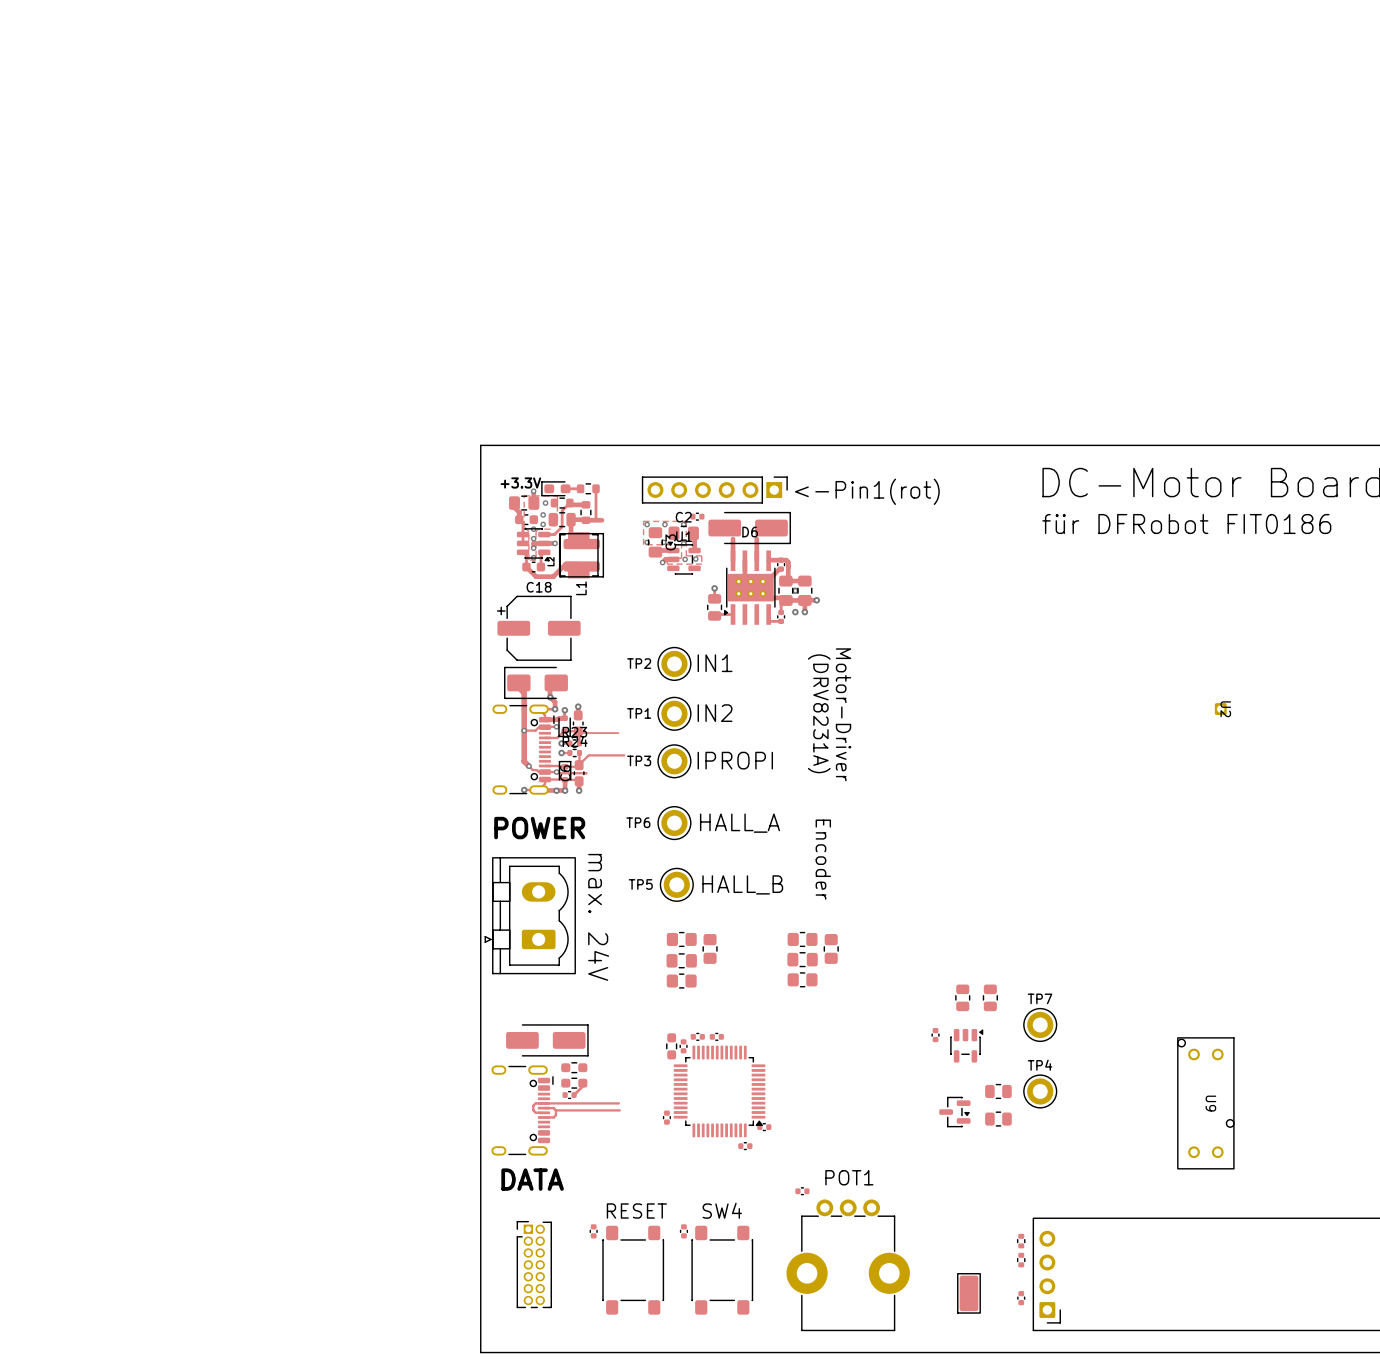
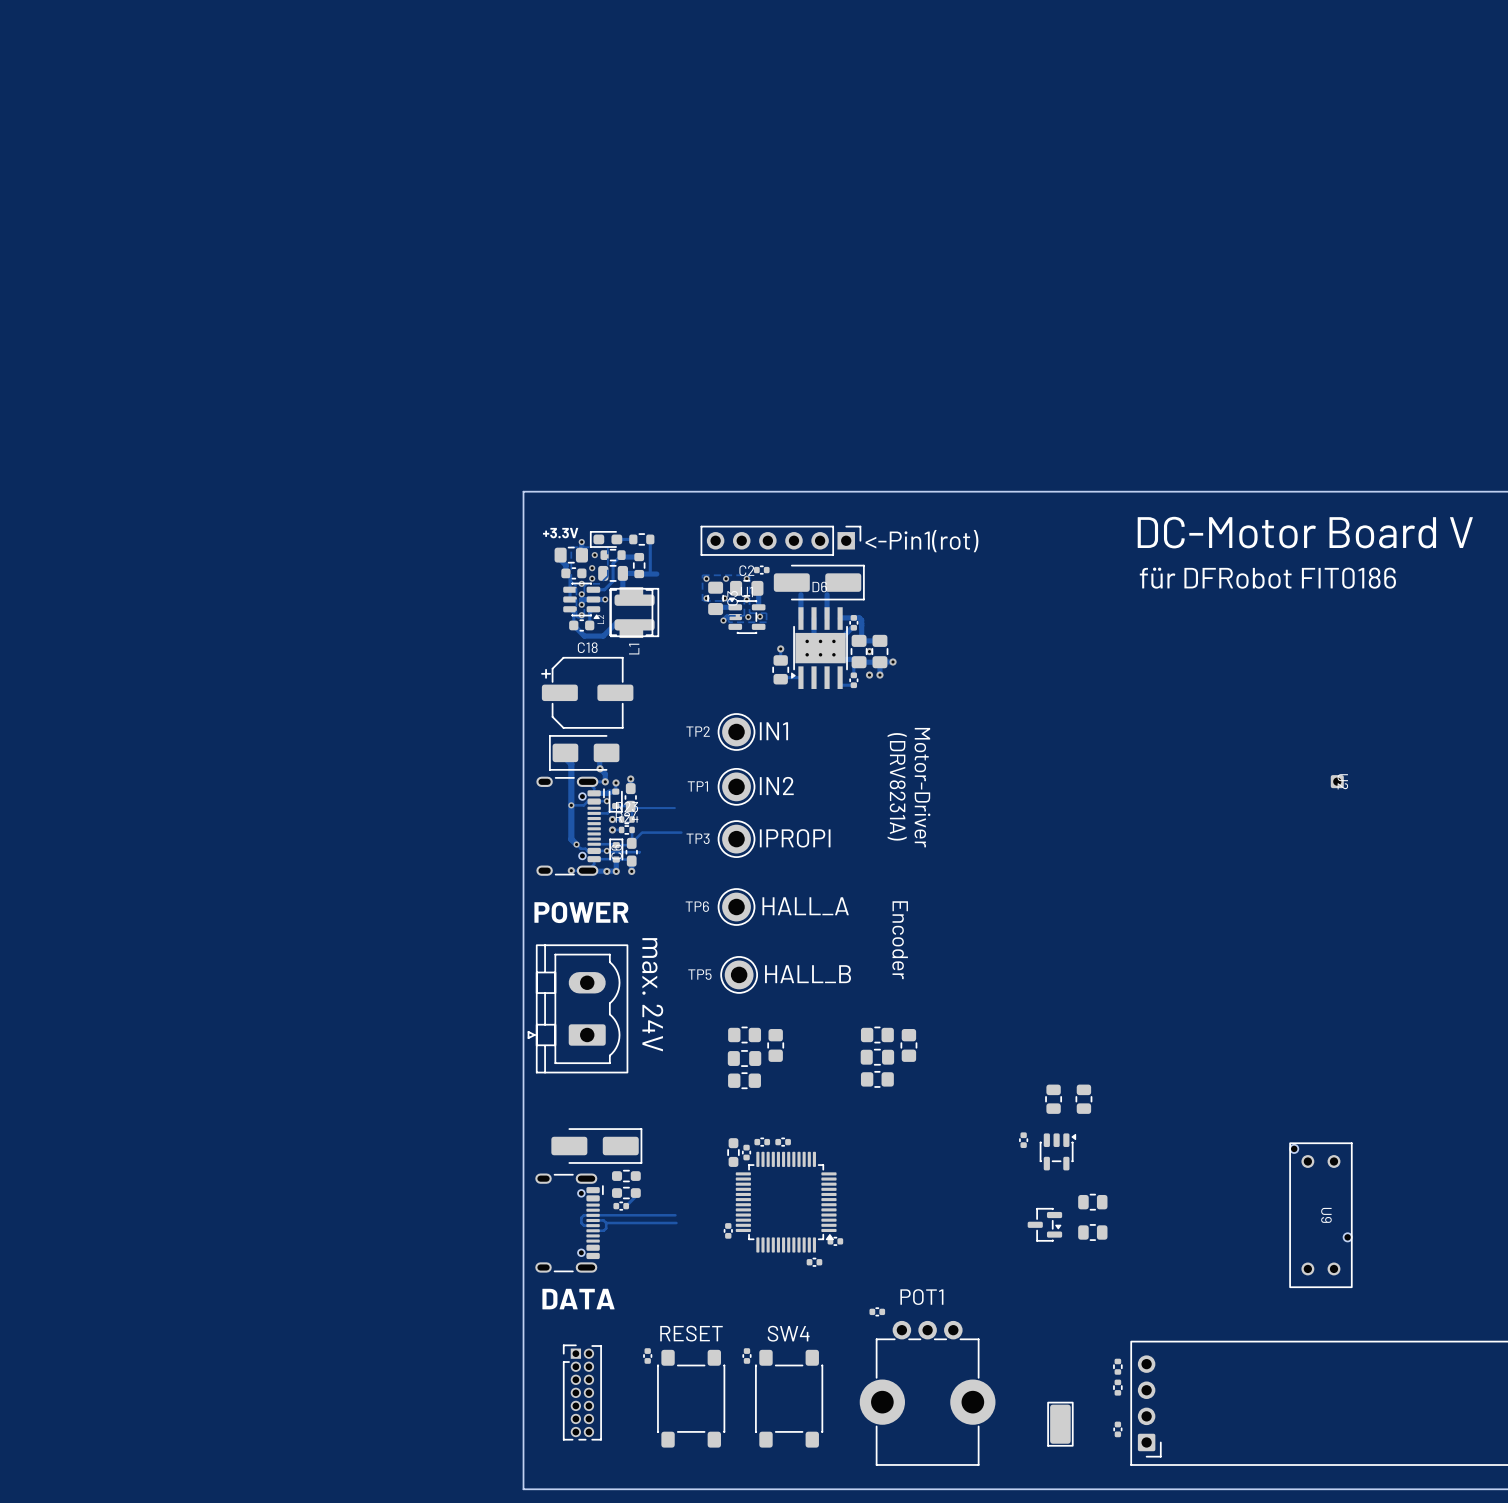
TP7: (1040, 1024) -> none
TP4: (1040, 1091) -> none

